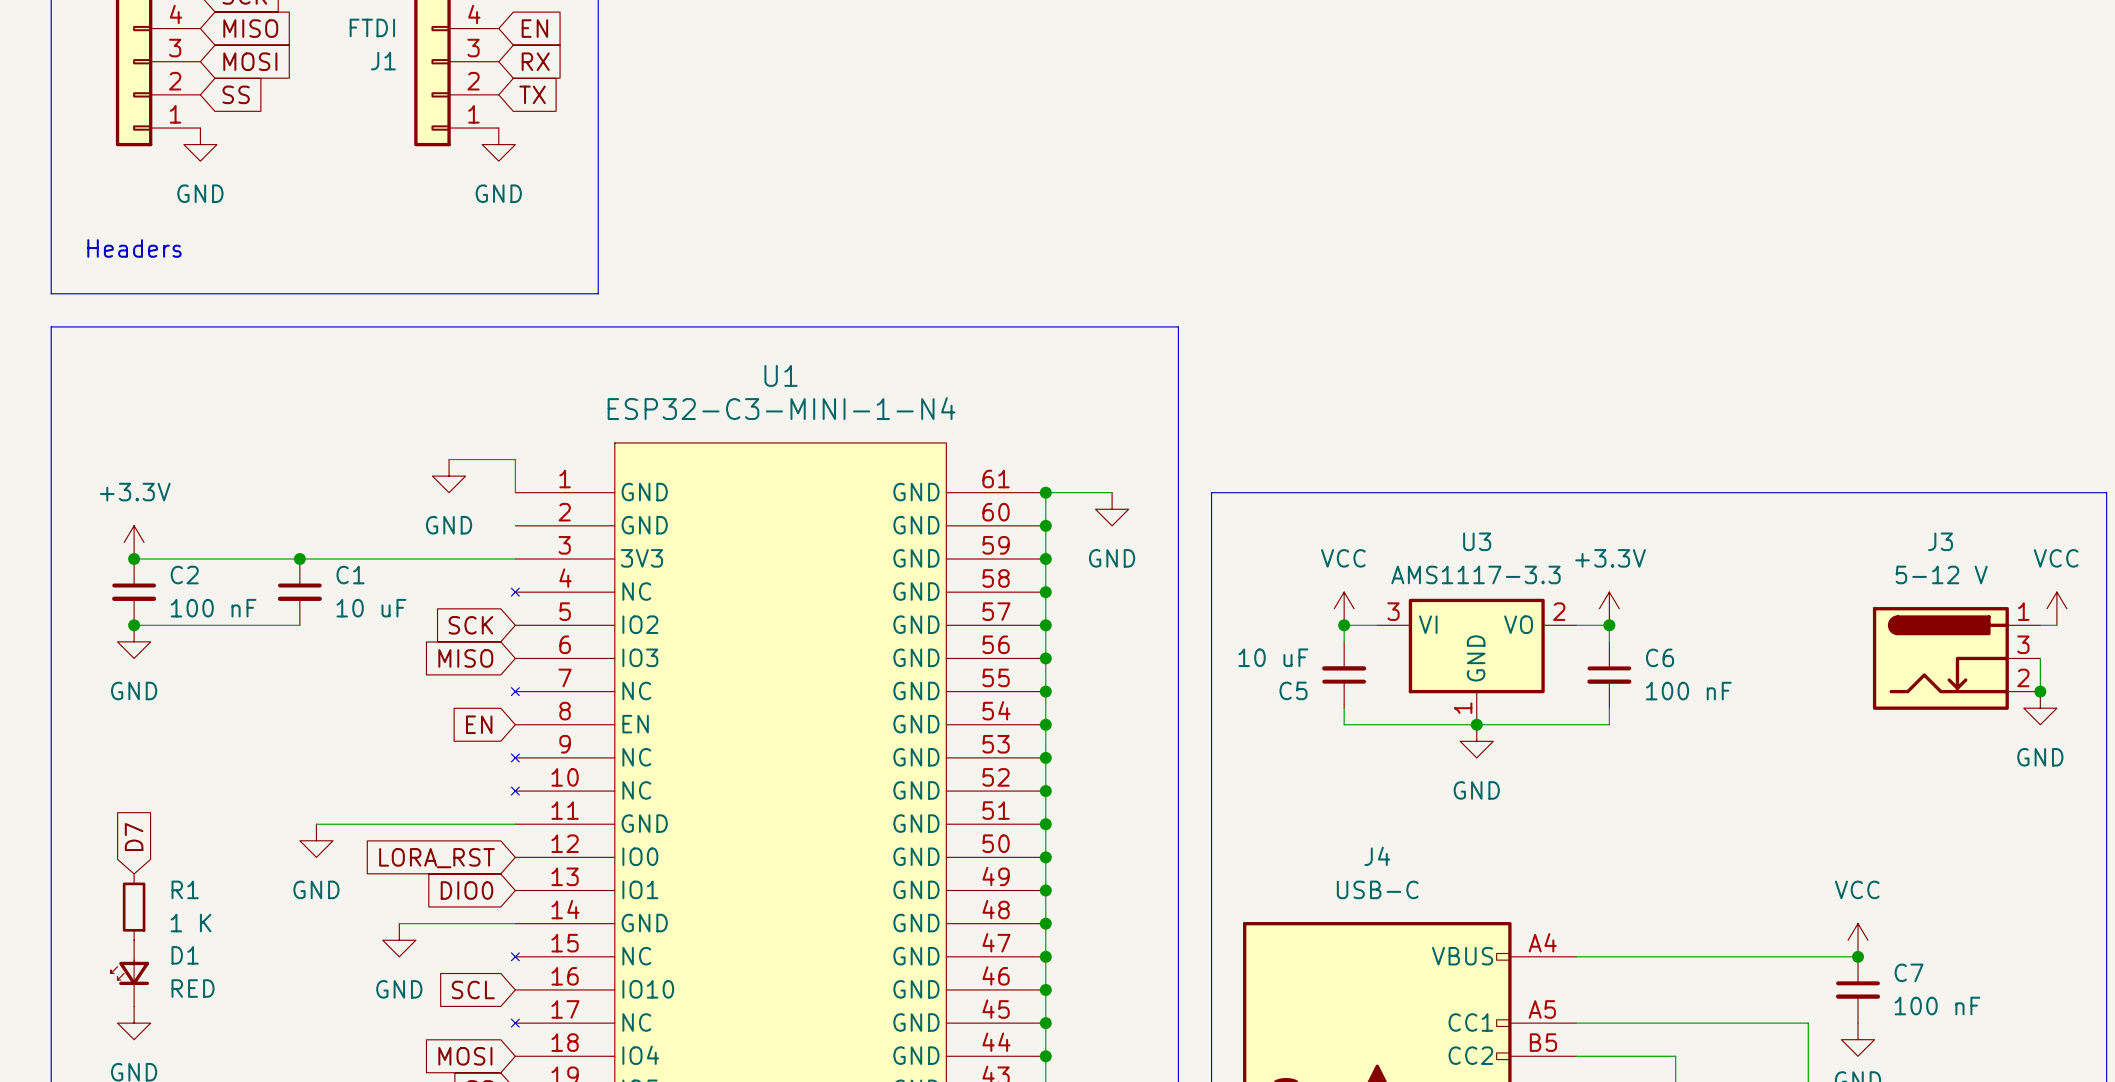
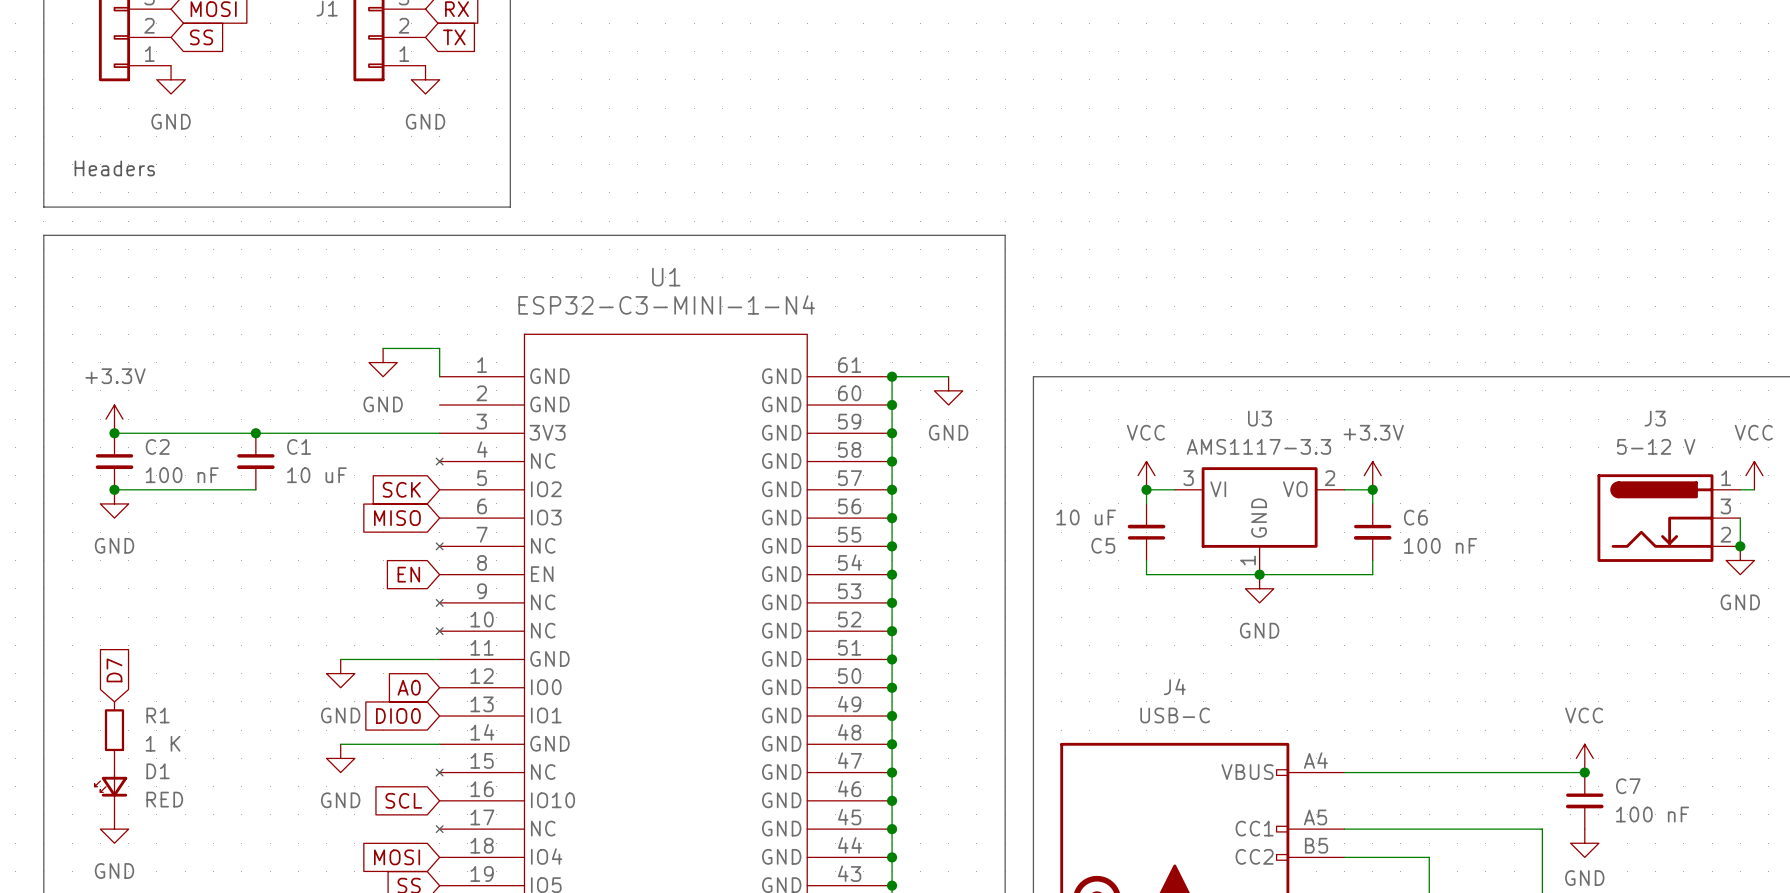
wire: (316, 824) (399, 824) -> none
power symbol position: GND (316, 840) -> GND (340, 673)
global label: LORA_RST (436, 858) -> A0 (409, 687)

